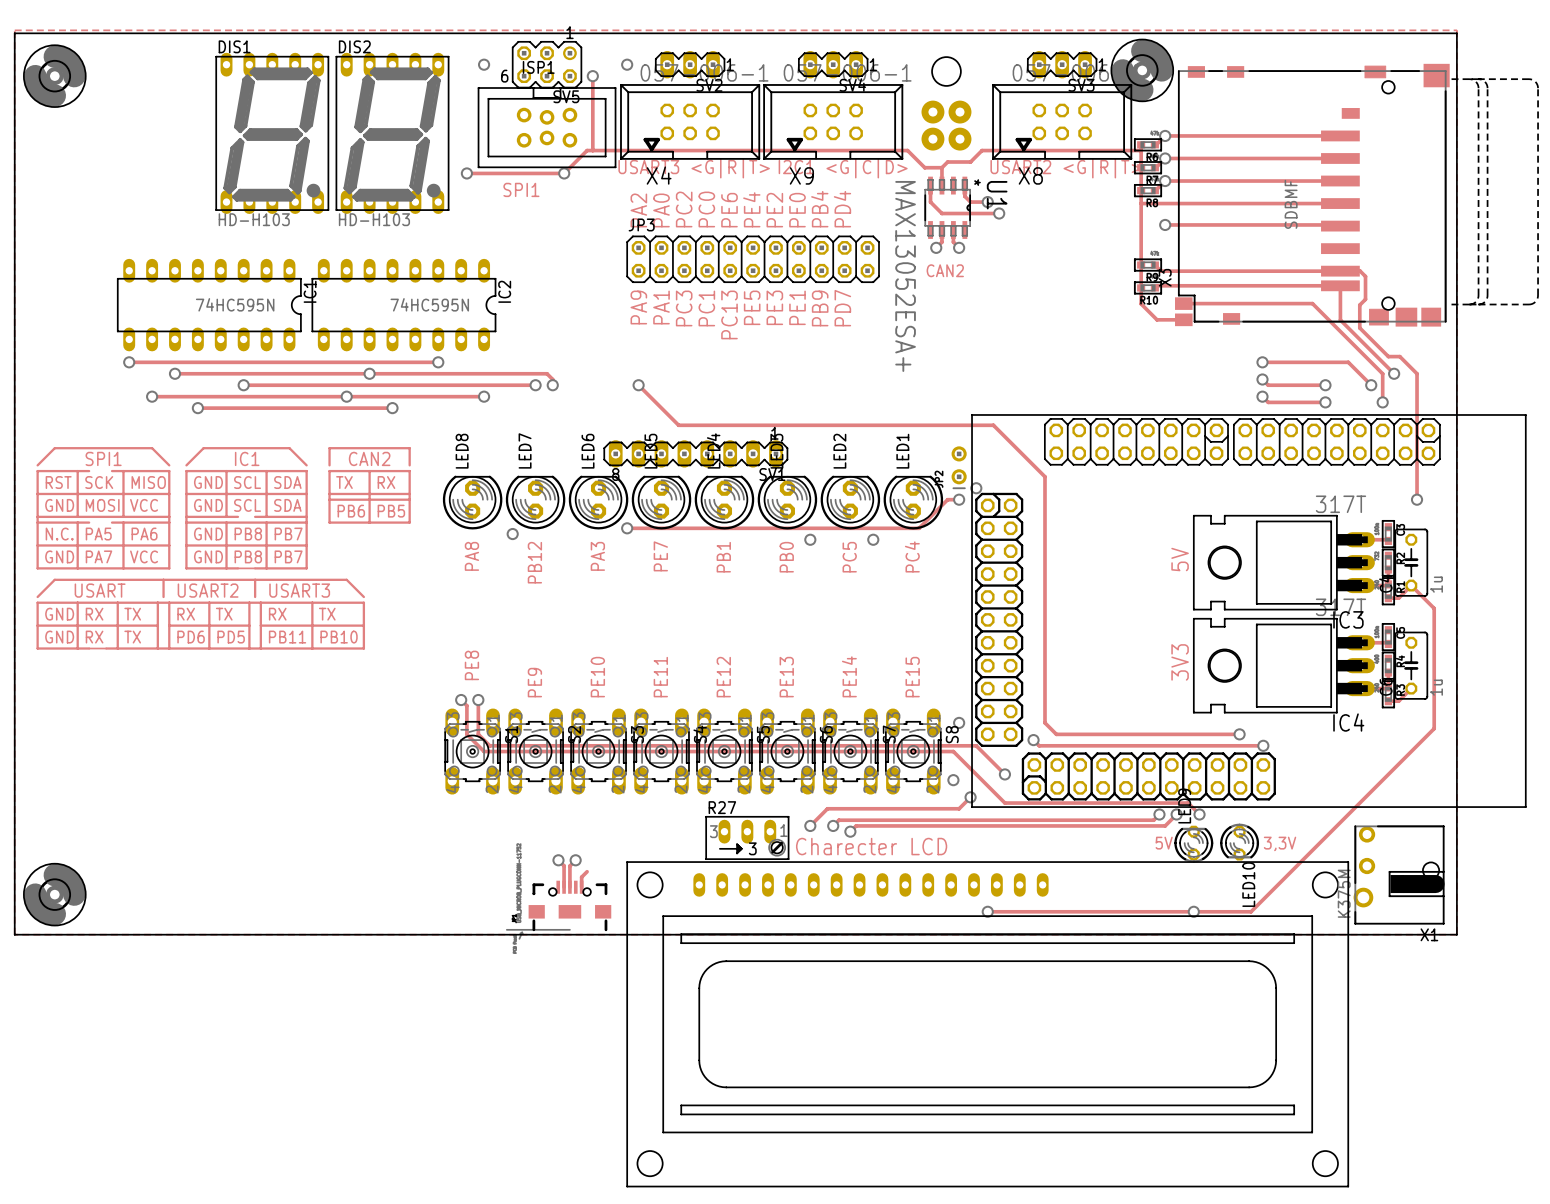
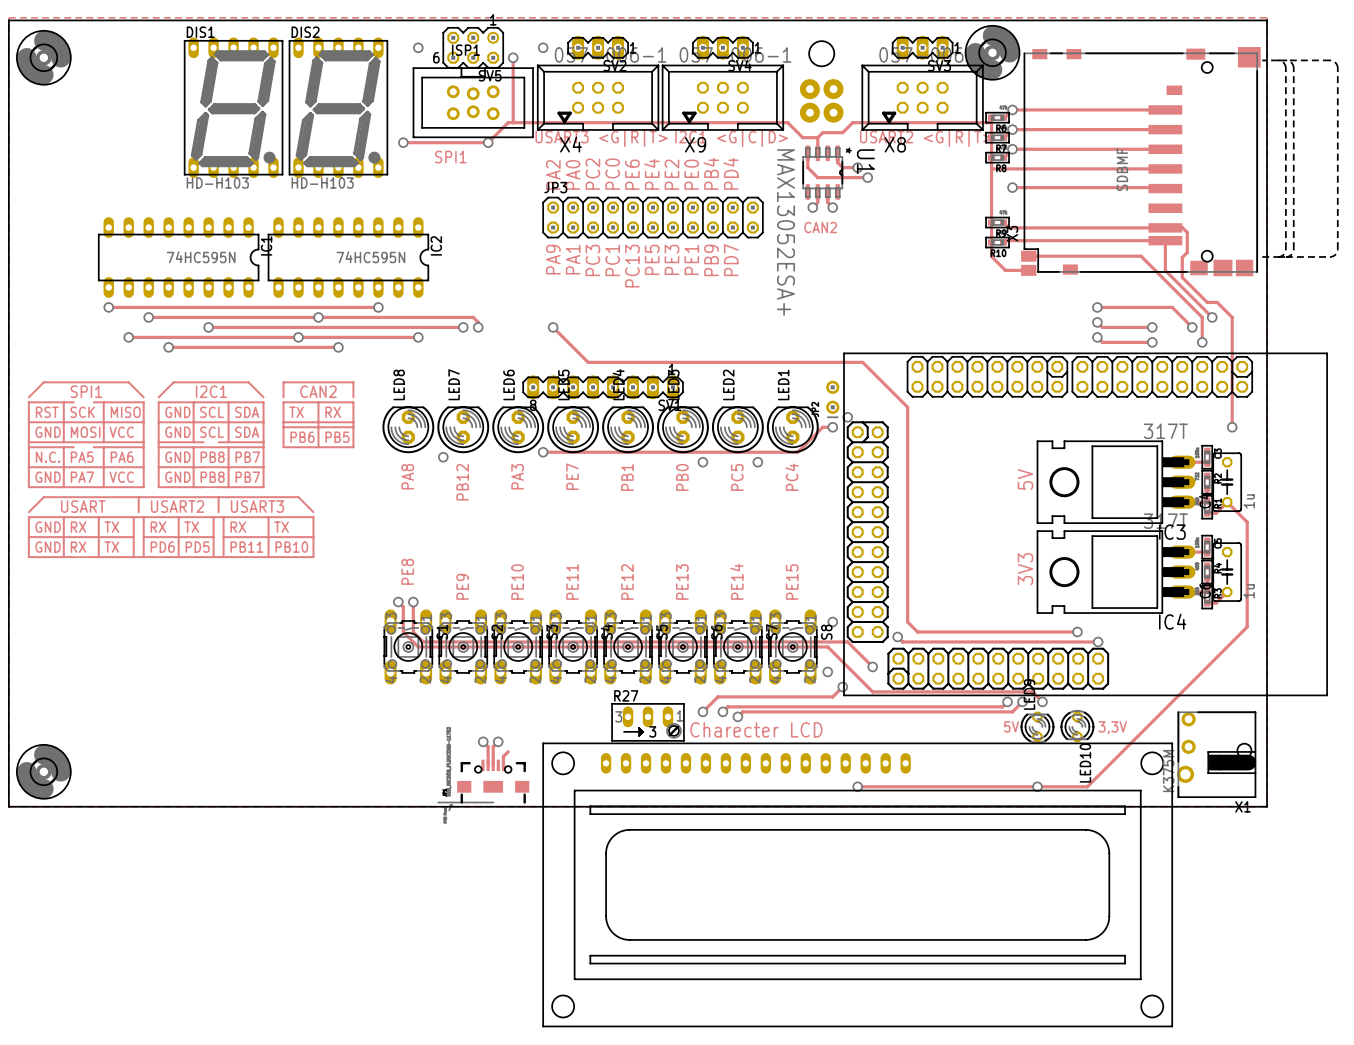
text: IC1 (247, 458) -> I2C1 (211, 391)

